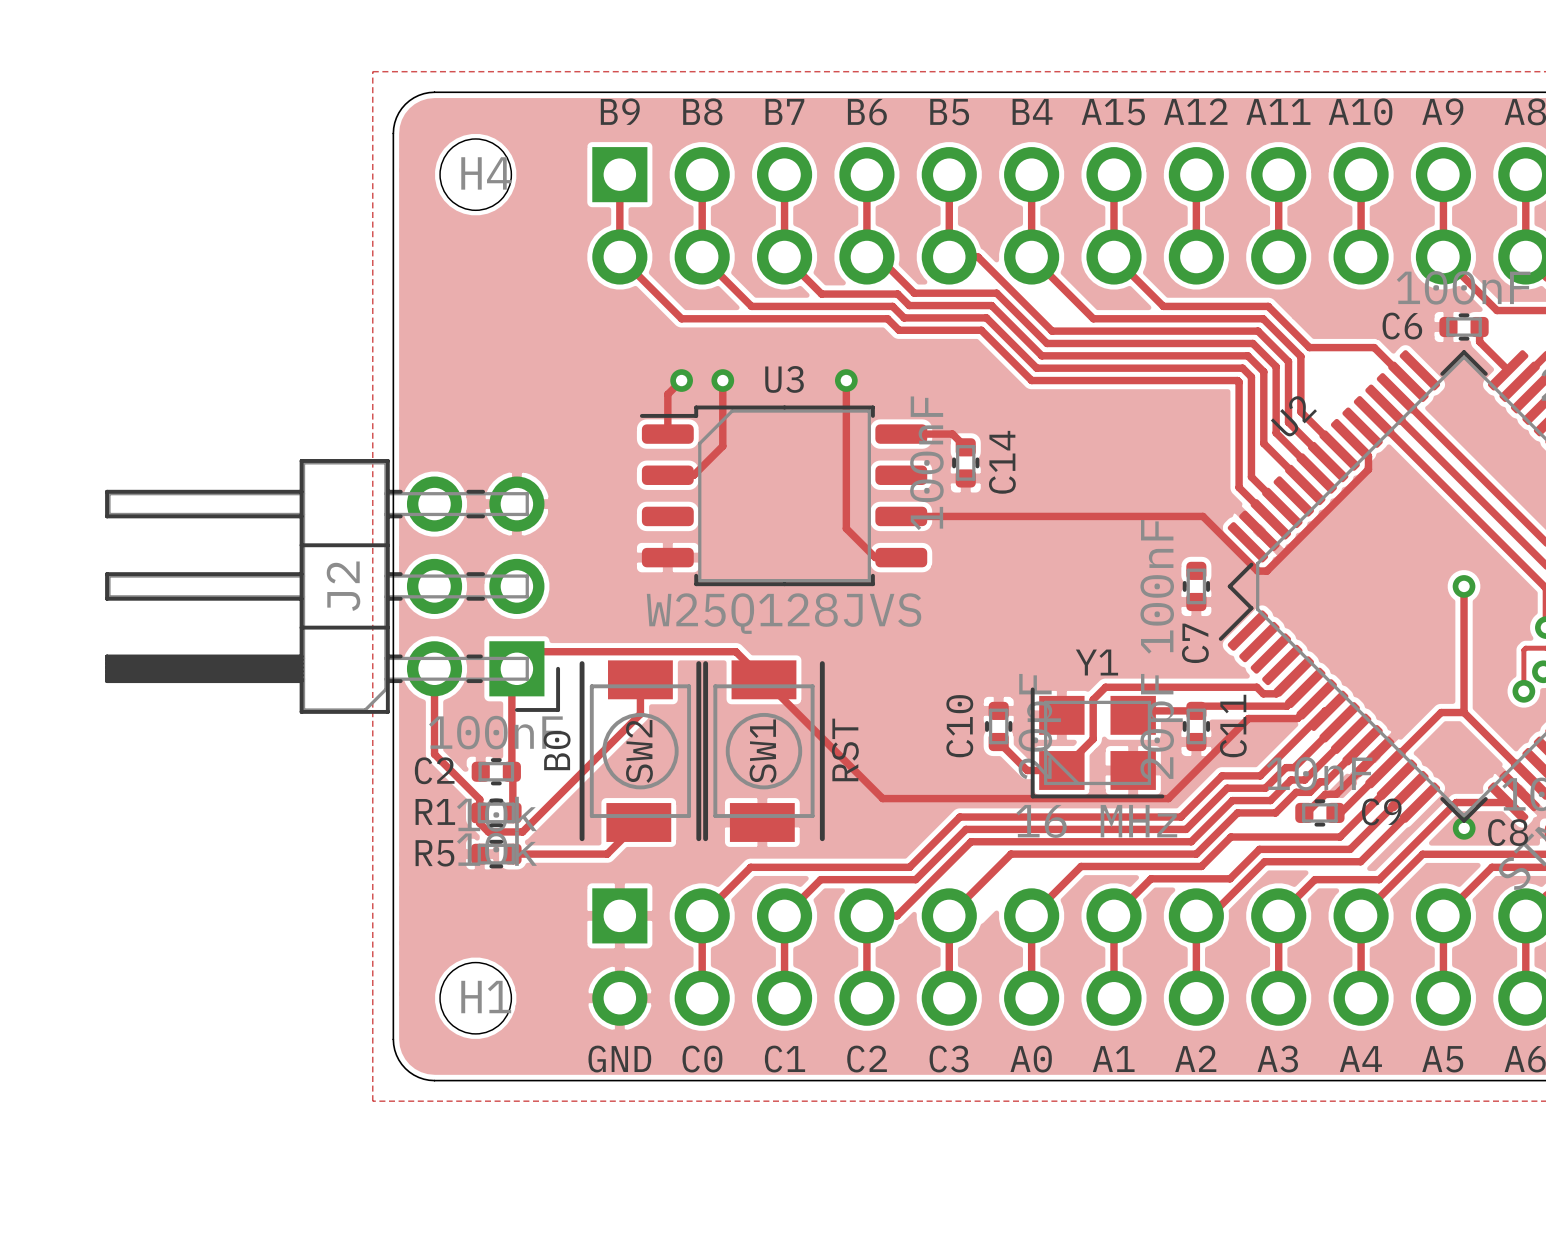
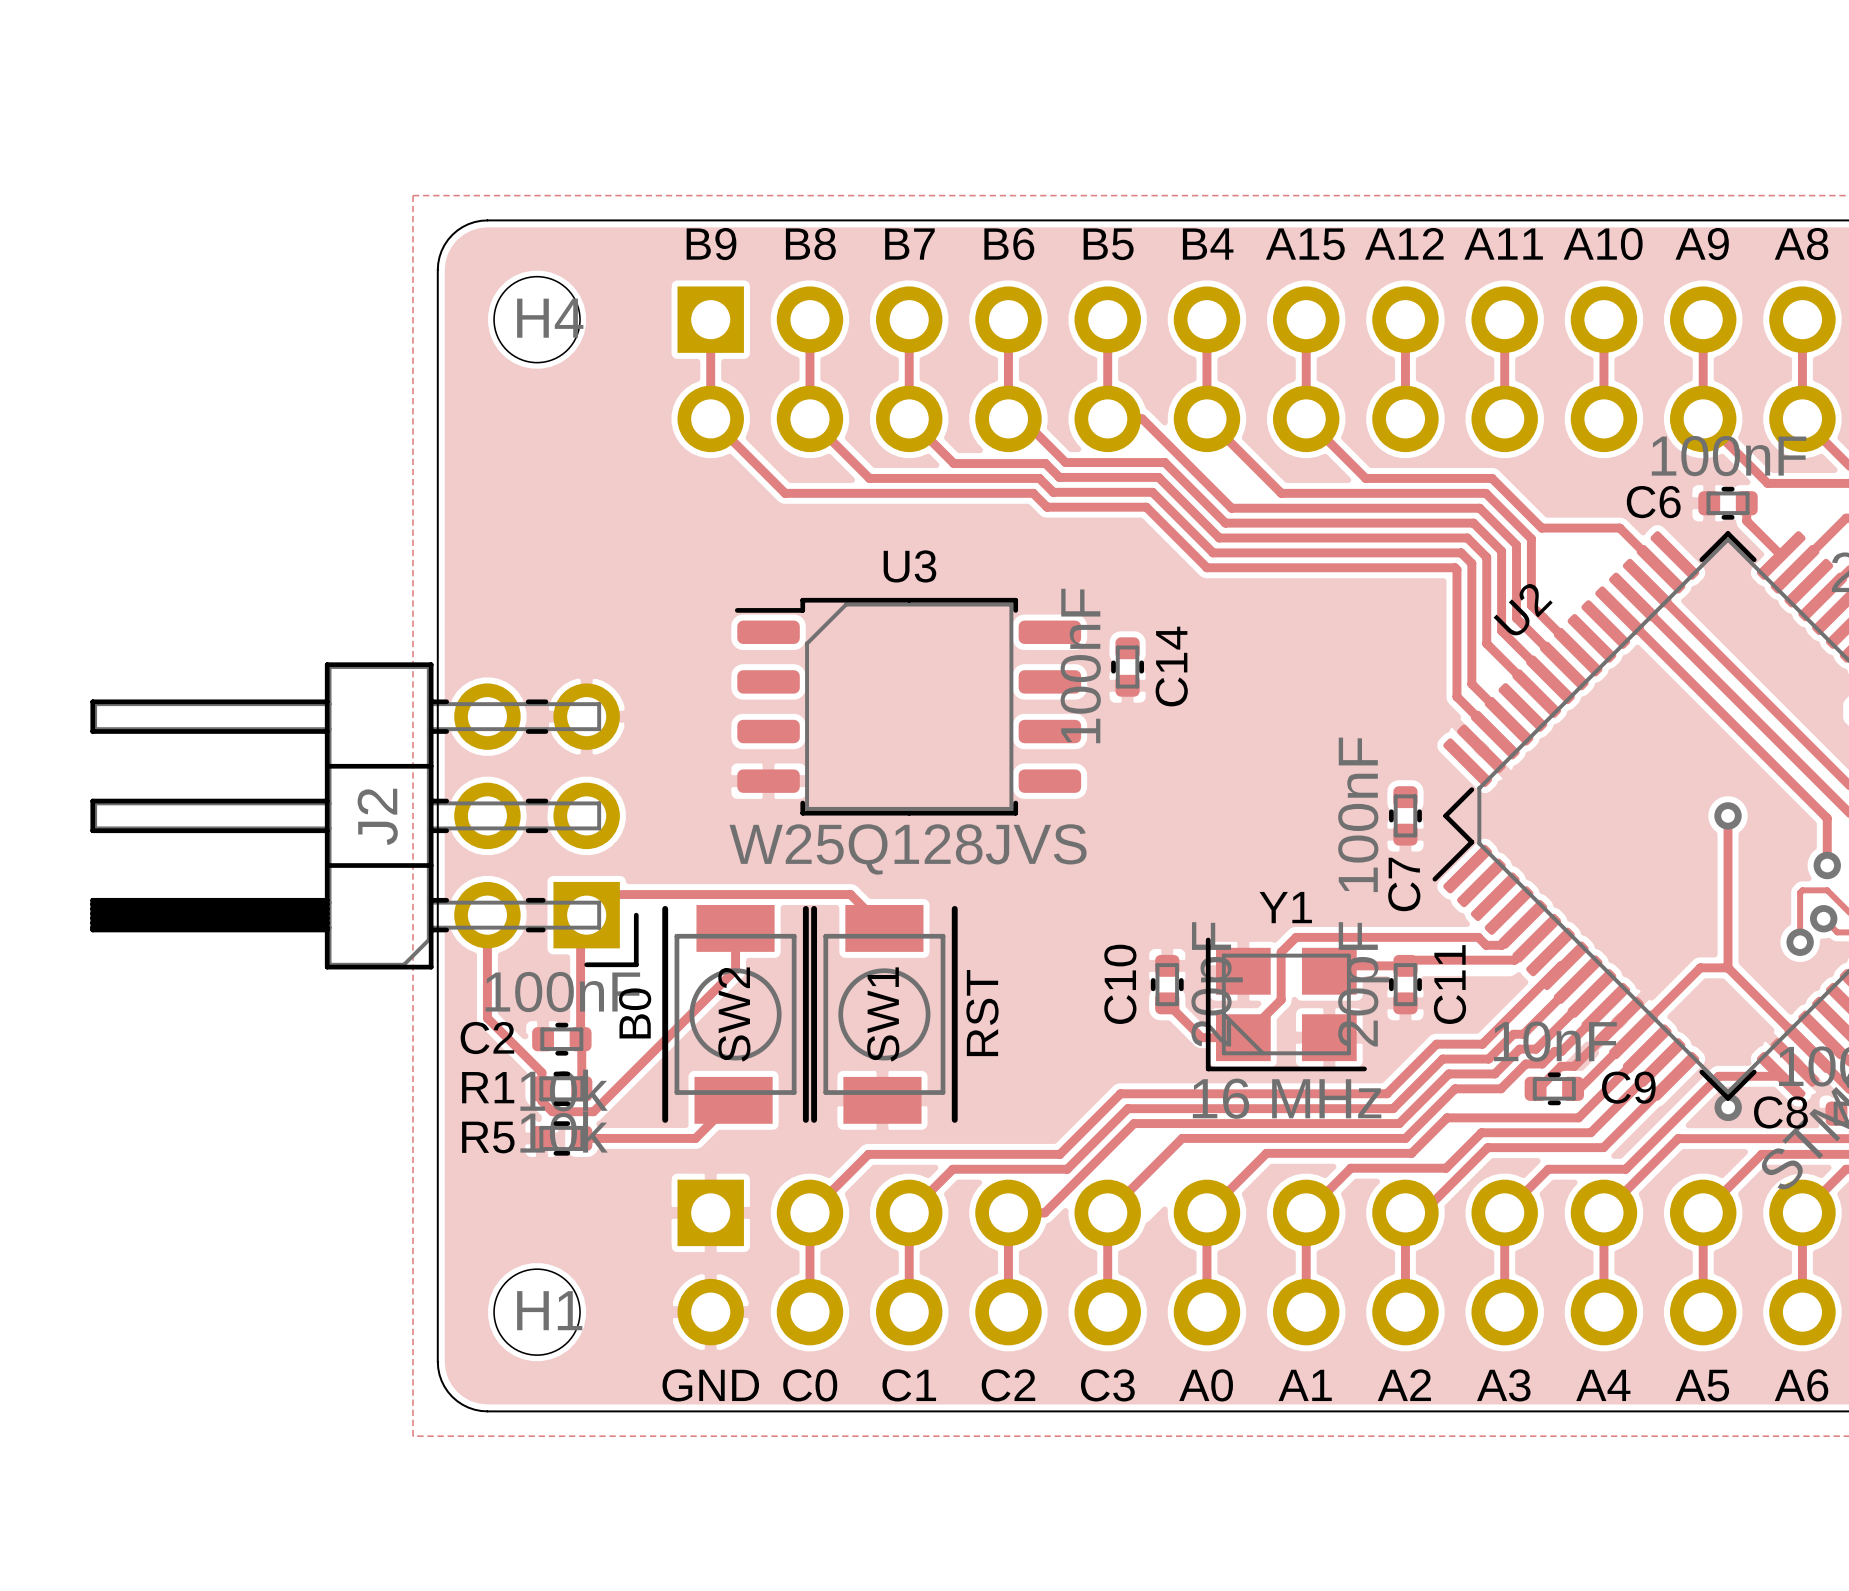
track: (681, 380) (667, 394) (667, 434) -> none
via: (681, 380) -> none
track: (722, 380) (722, 446) (693, 475) (667, 475) -> none
via: (722, 380) -> none
track: (846, 380) (846, 528) (875, 557) (901, 557) -> none
via: (846, 380) -> none
track: (901, 434) (952, 434) (965, 447) -> none
track: (1351, 439) (1368, 456) (1368, 469) (1266, 571) (1257, 571) (1202, 516) (901, 516) -> none
track: (763, 679) (882, 798) (1168, 798) (1248, 718) (1297, 718) (1316, 699) -> none

